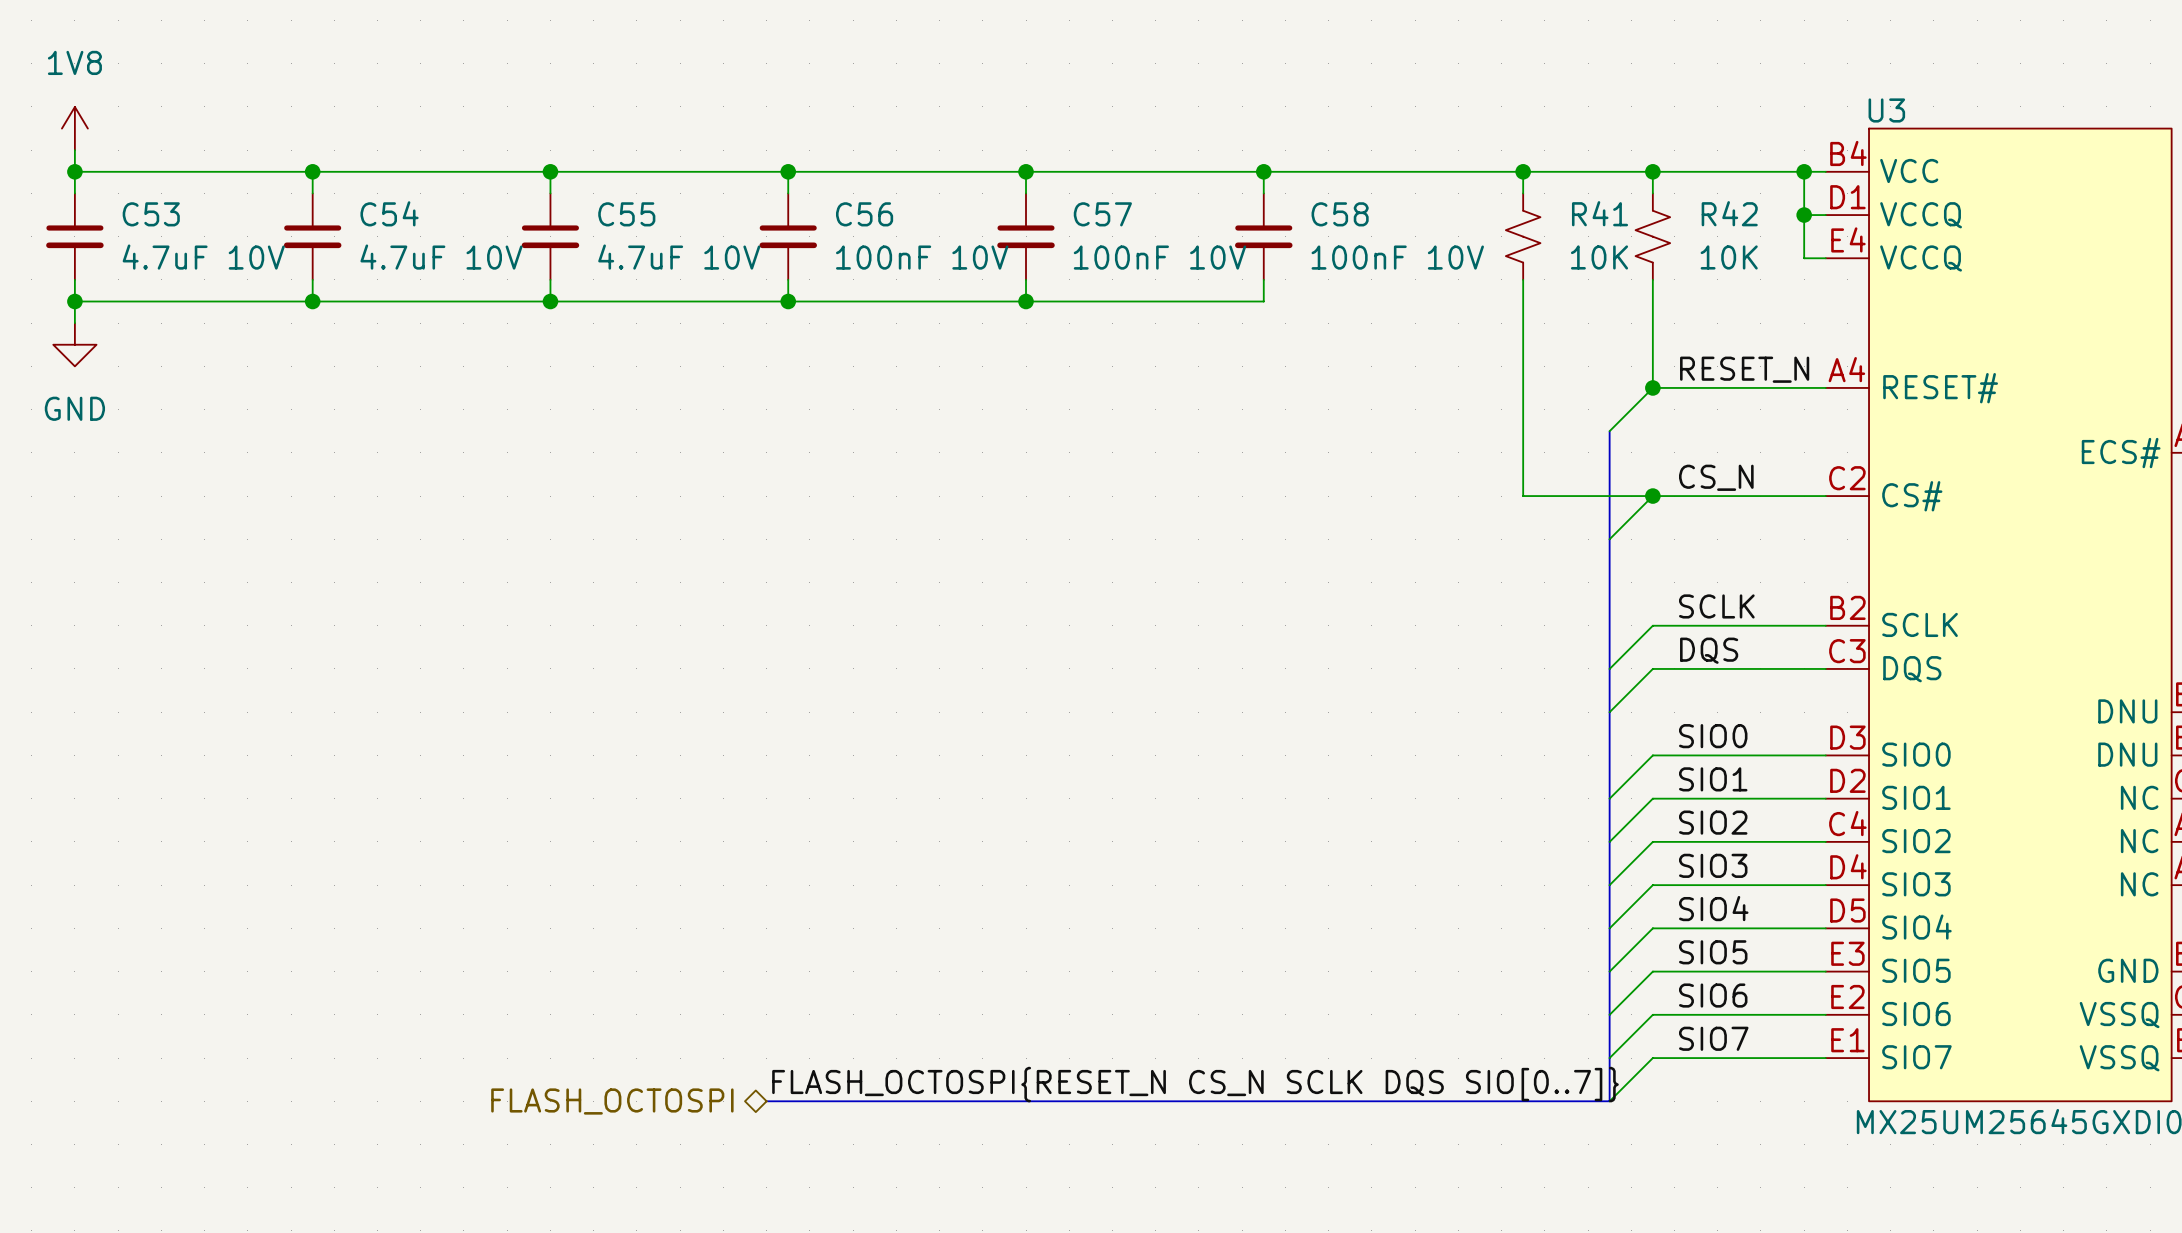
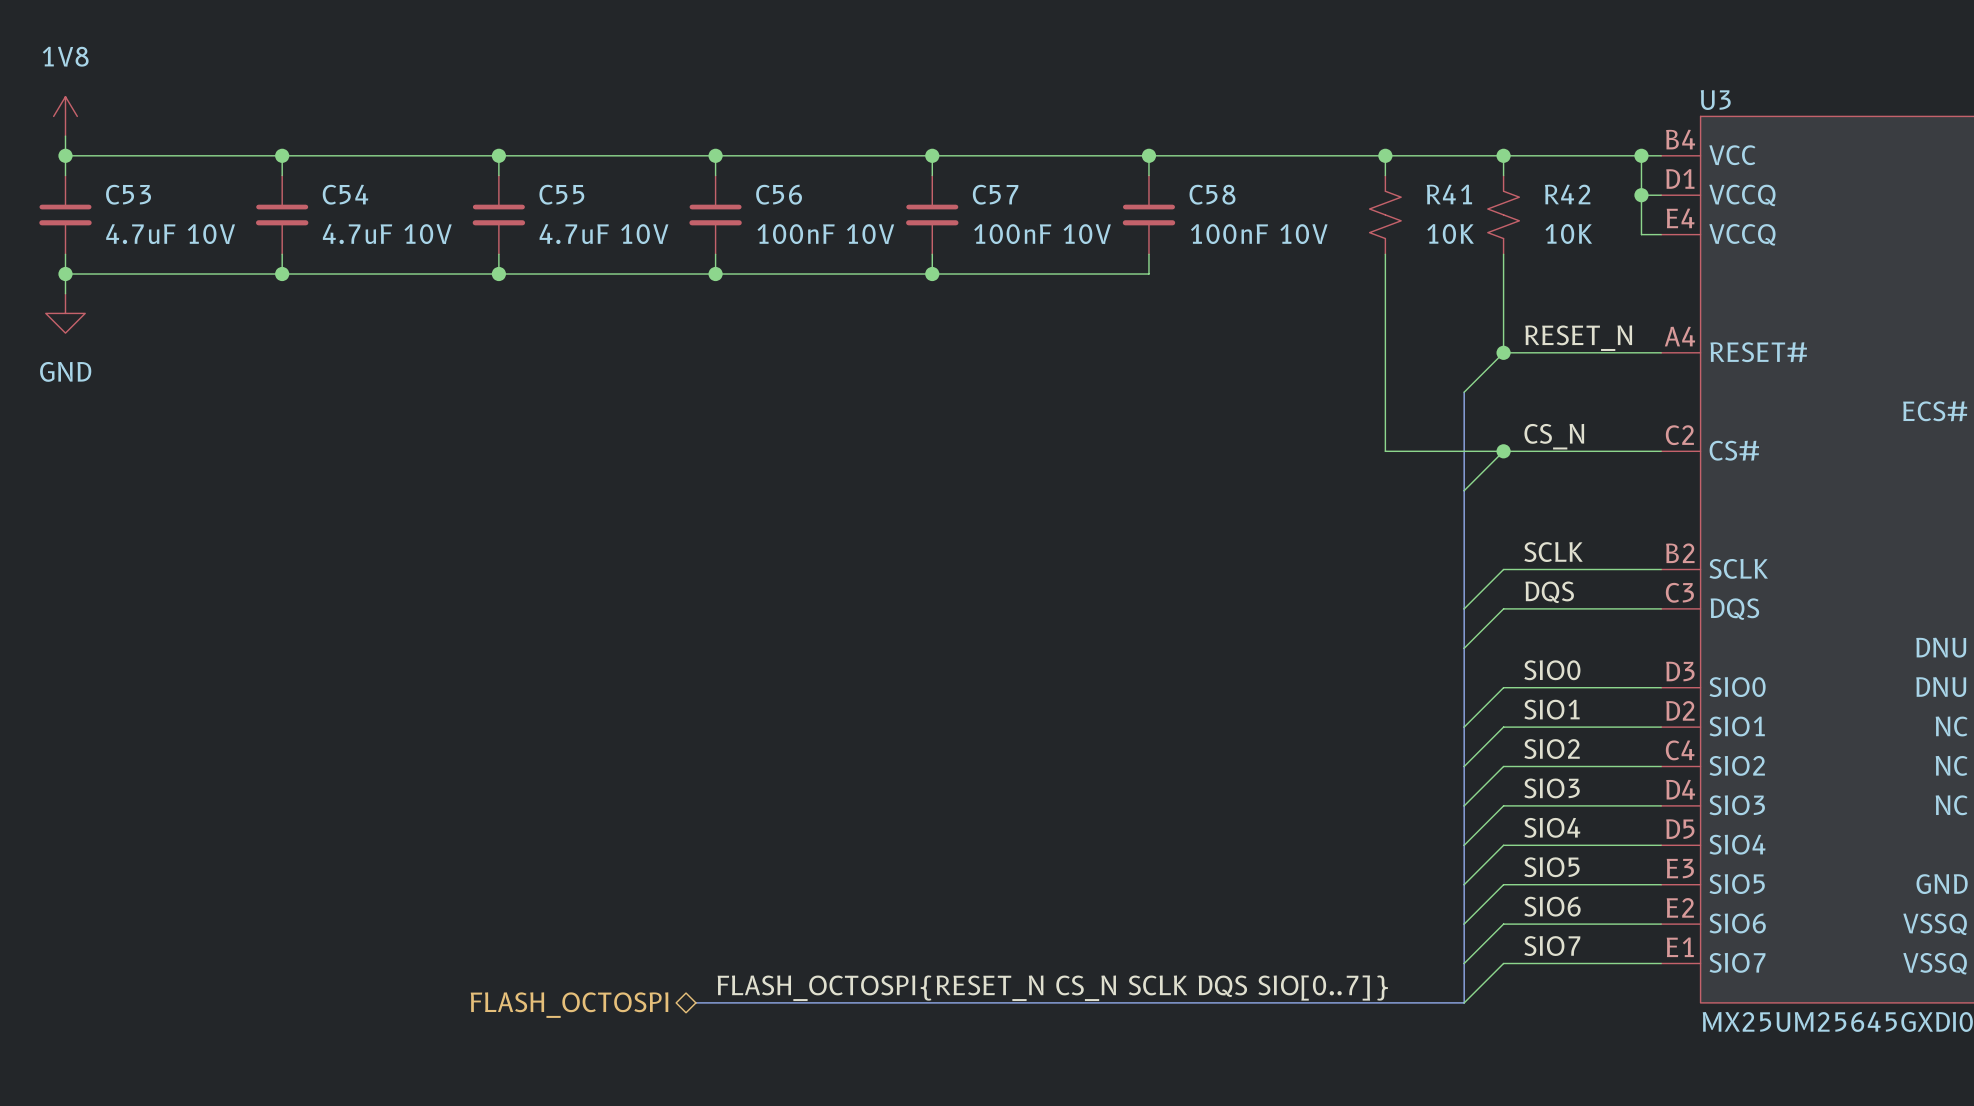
label position: FLASH_OCTOSPI{RESET_N CS_N SCLK DQS SIO[0..7]} (1195, 1084) -> FLASH_OCTOSPI{RESET_N CS_N SCLK DQS SIO[0..7]} (1052, 988)

